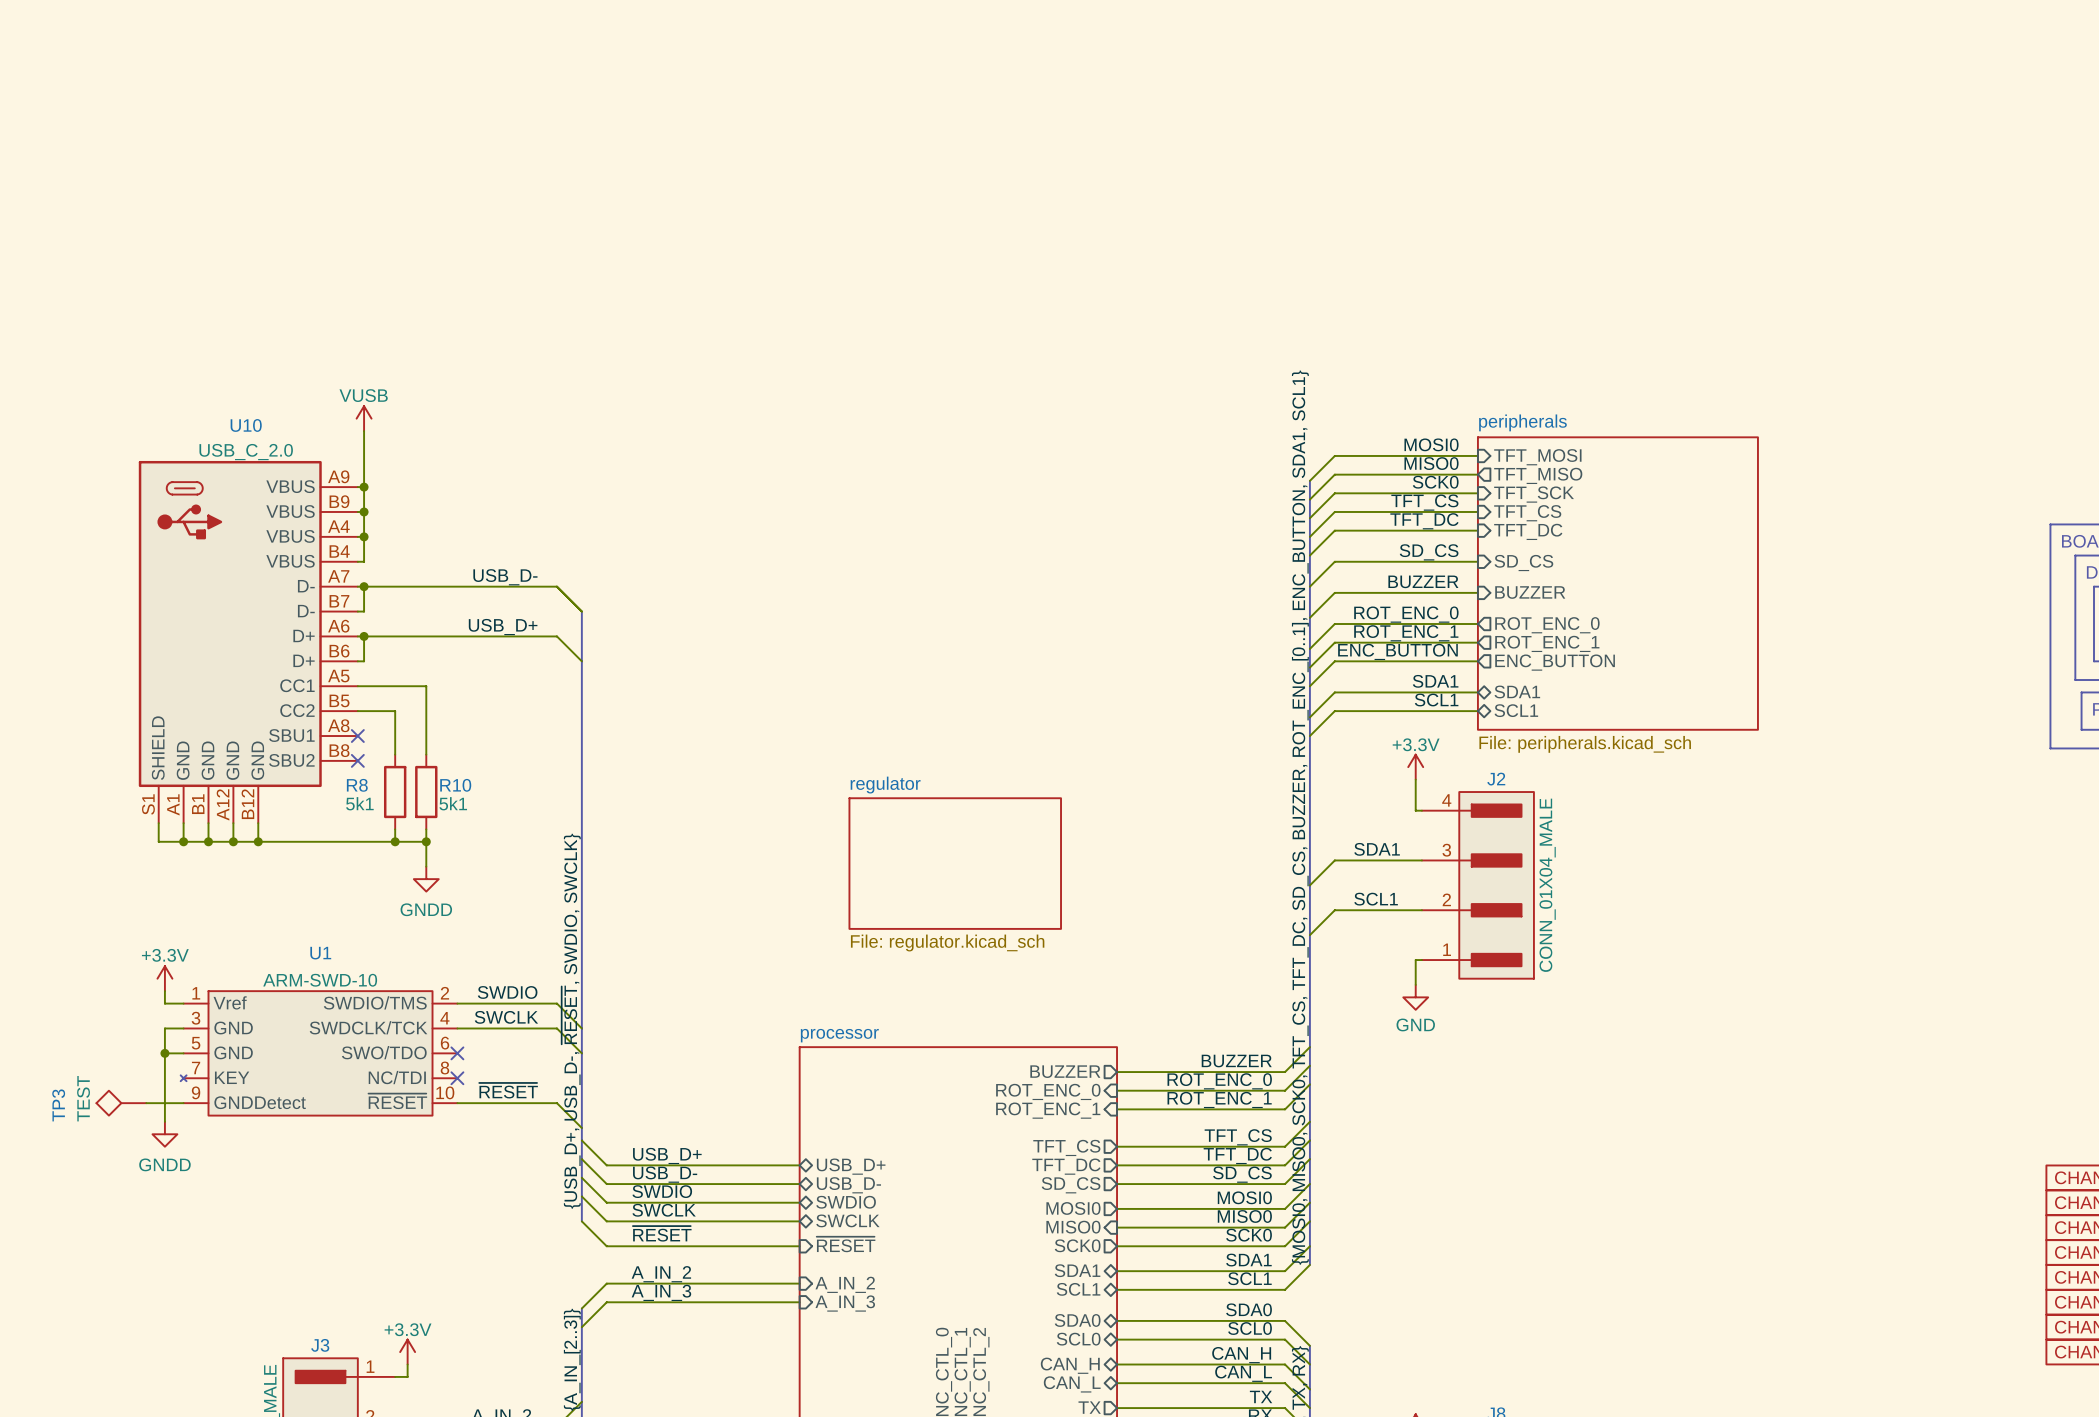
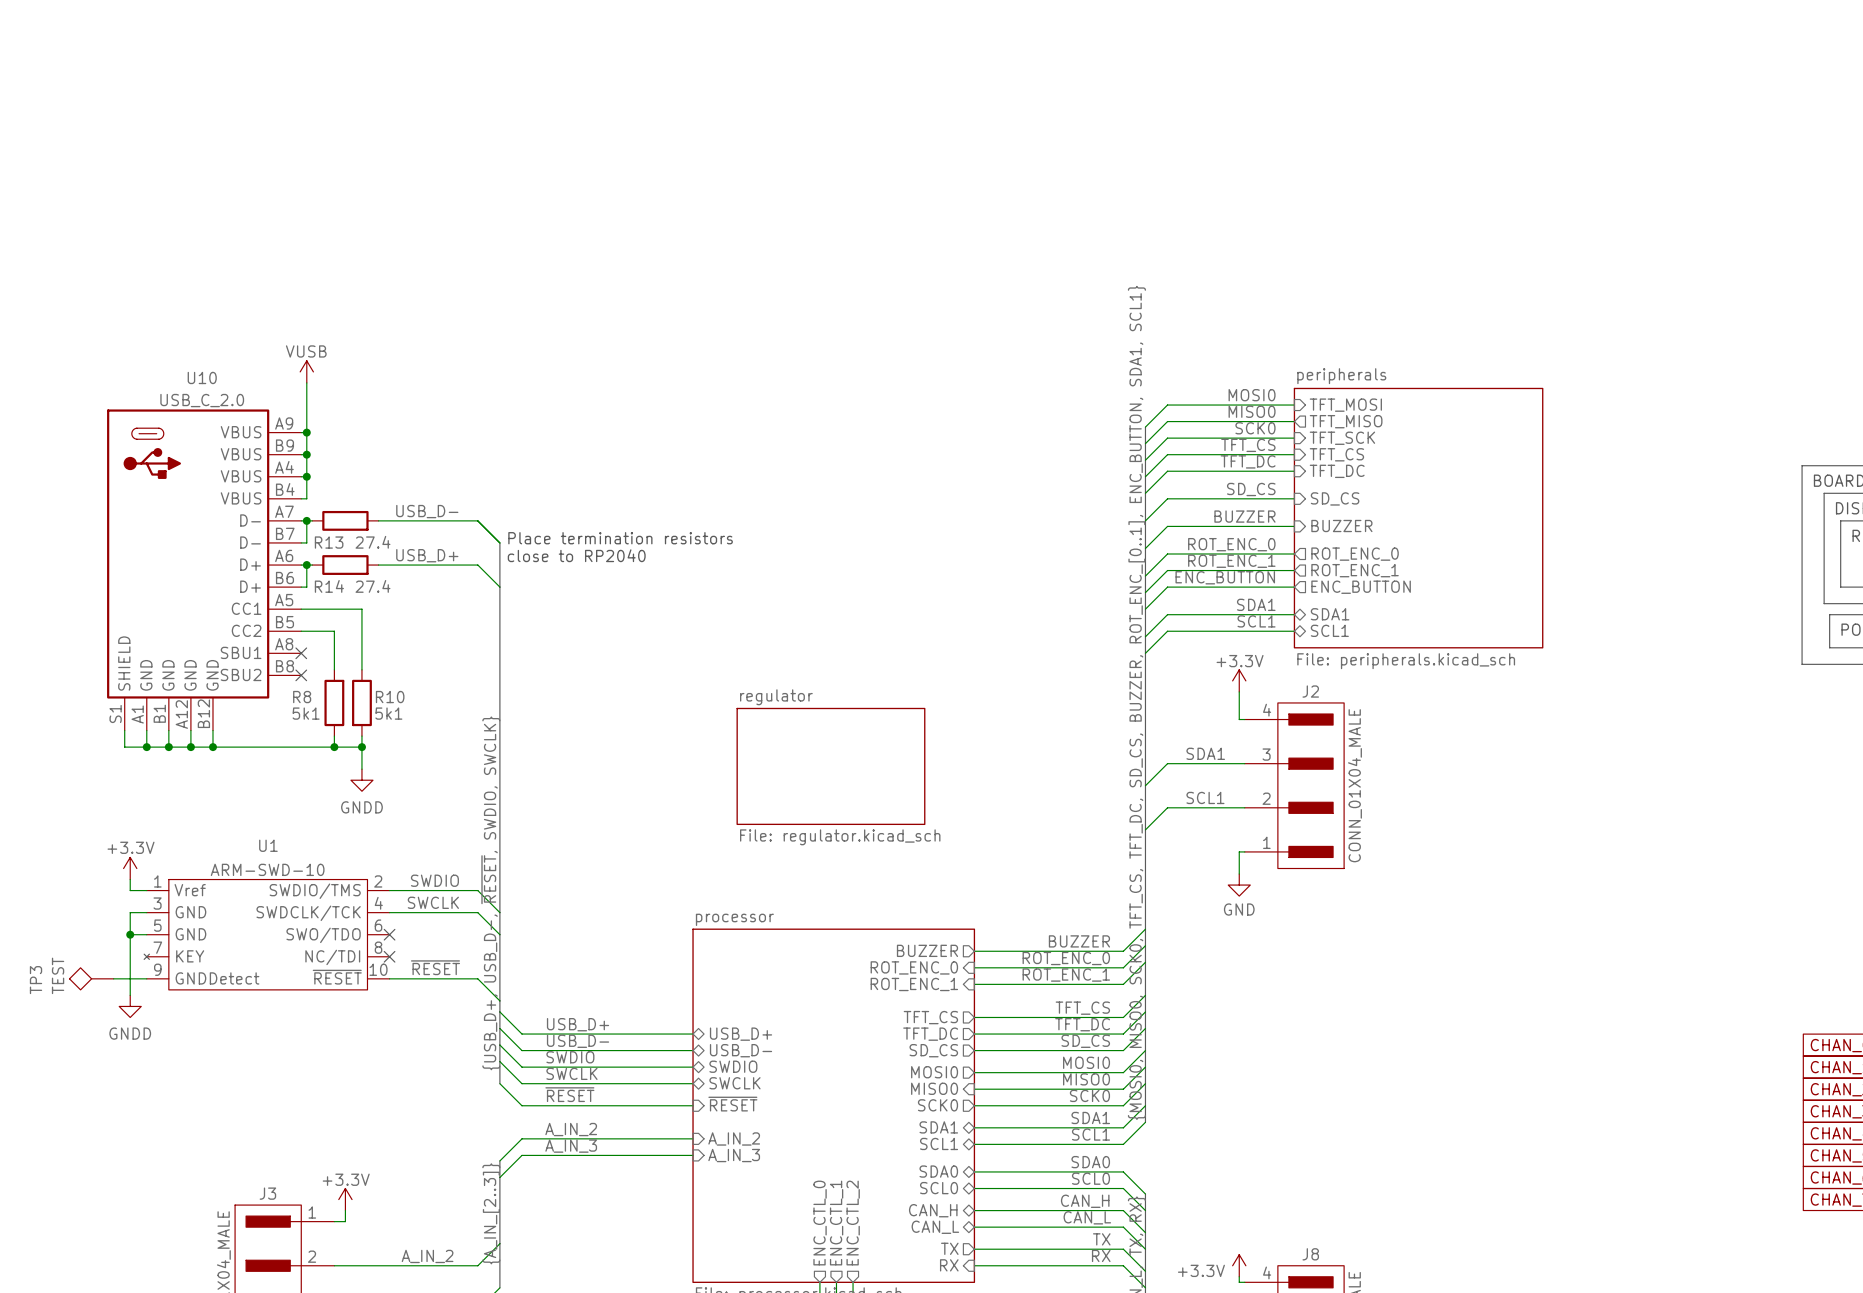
wire: (370, 586) (444, 586) -> none
R13: none -> 27.4 (345, 520)
text: none -> Place termination resistors (620, 538)
text: none -> close to RP2040 (576, 555)
wire: (370, 636) (444, 636) -> none
R14: none -> 27.4 (345, 565)

